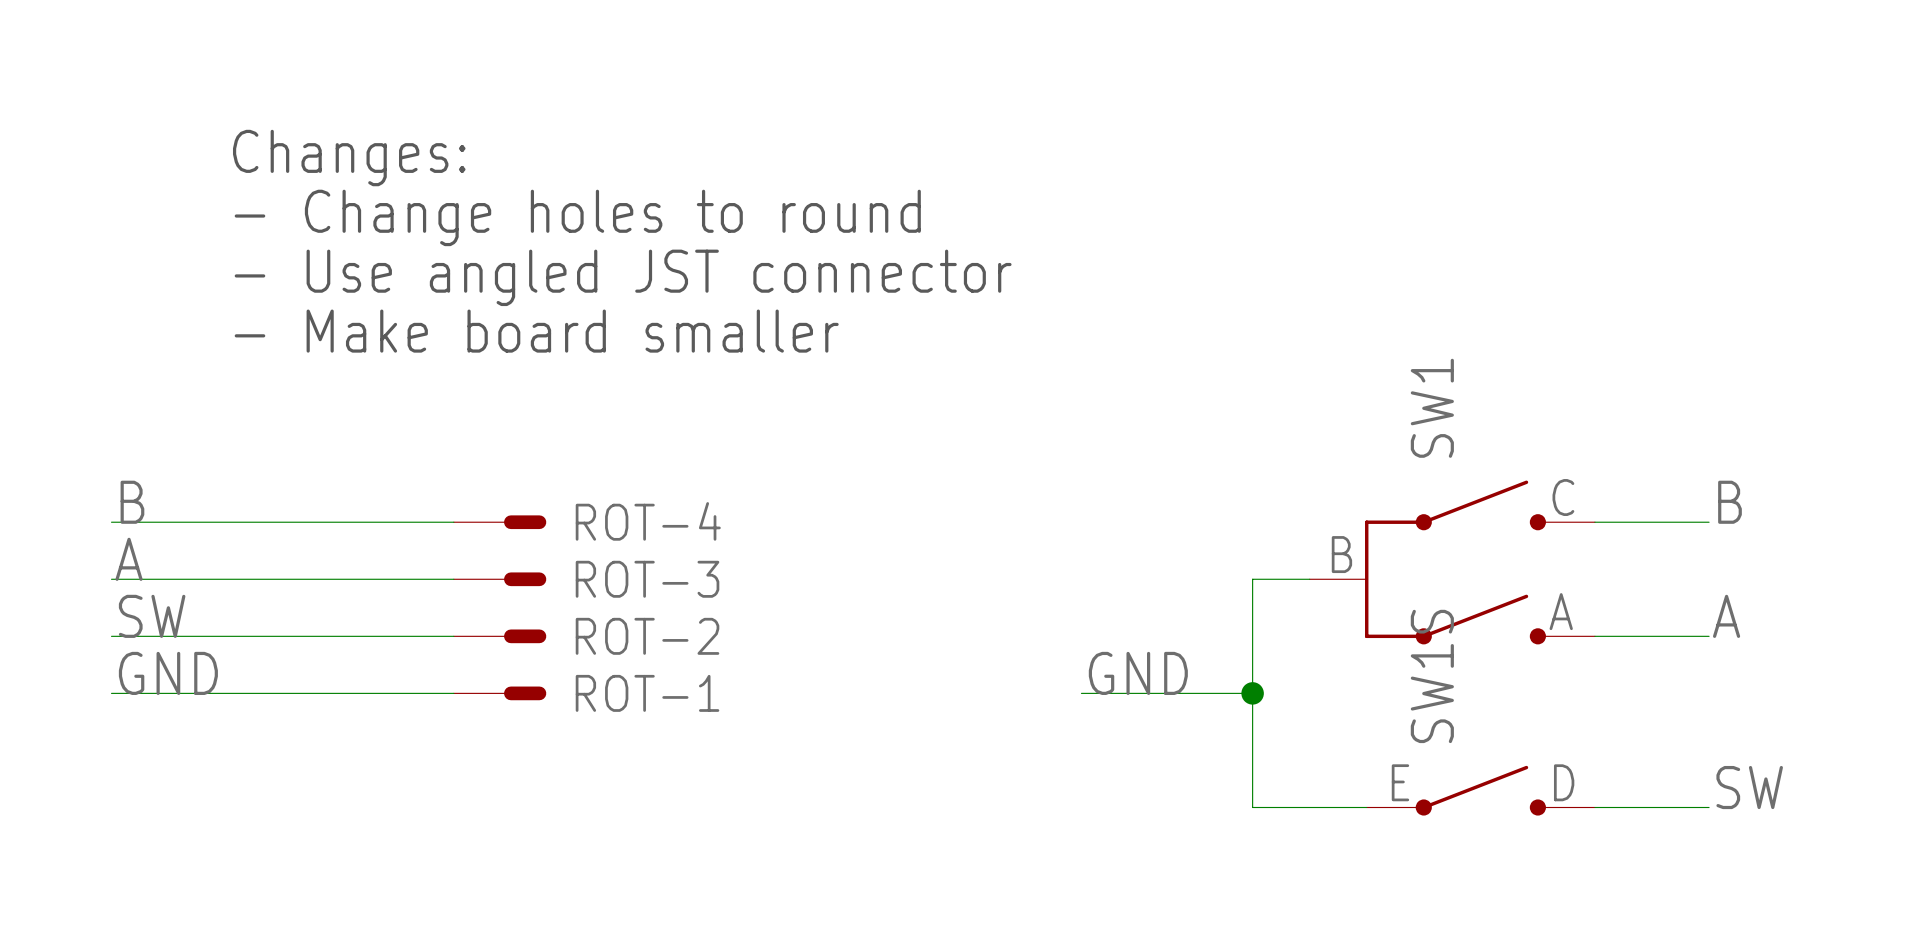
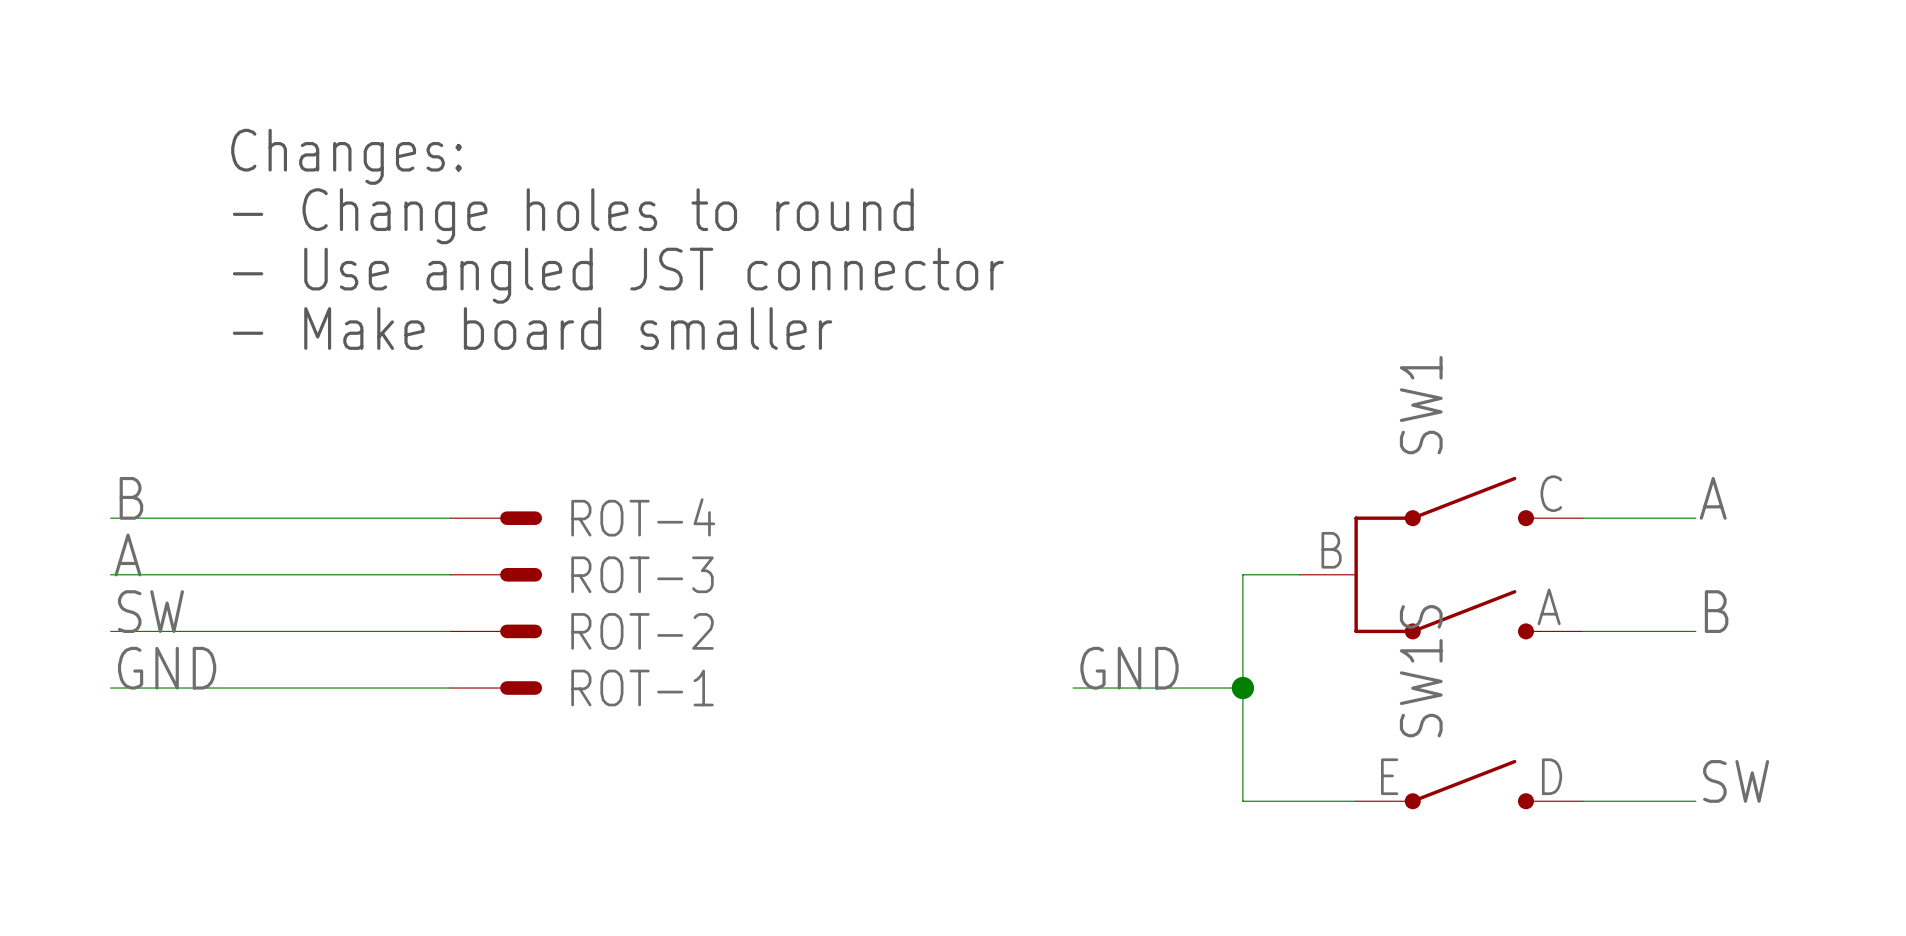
label: B (1729, 502) -> A (1713, 498)
label: A (1726, 616) -> B (1716, 611)

